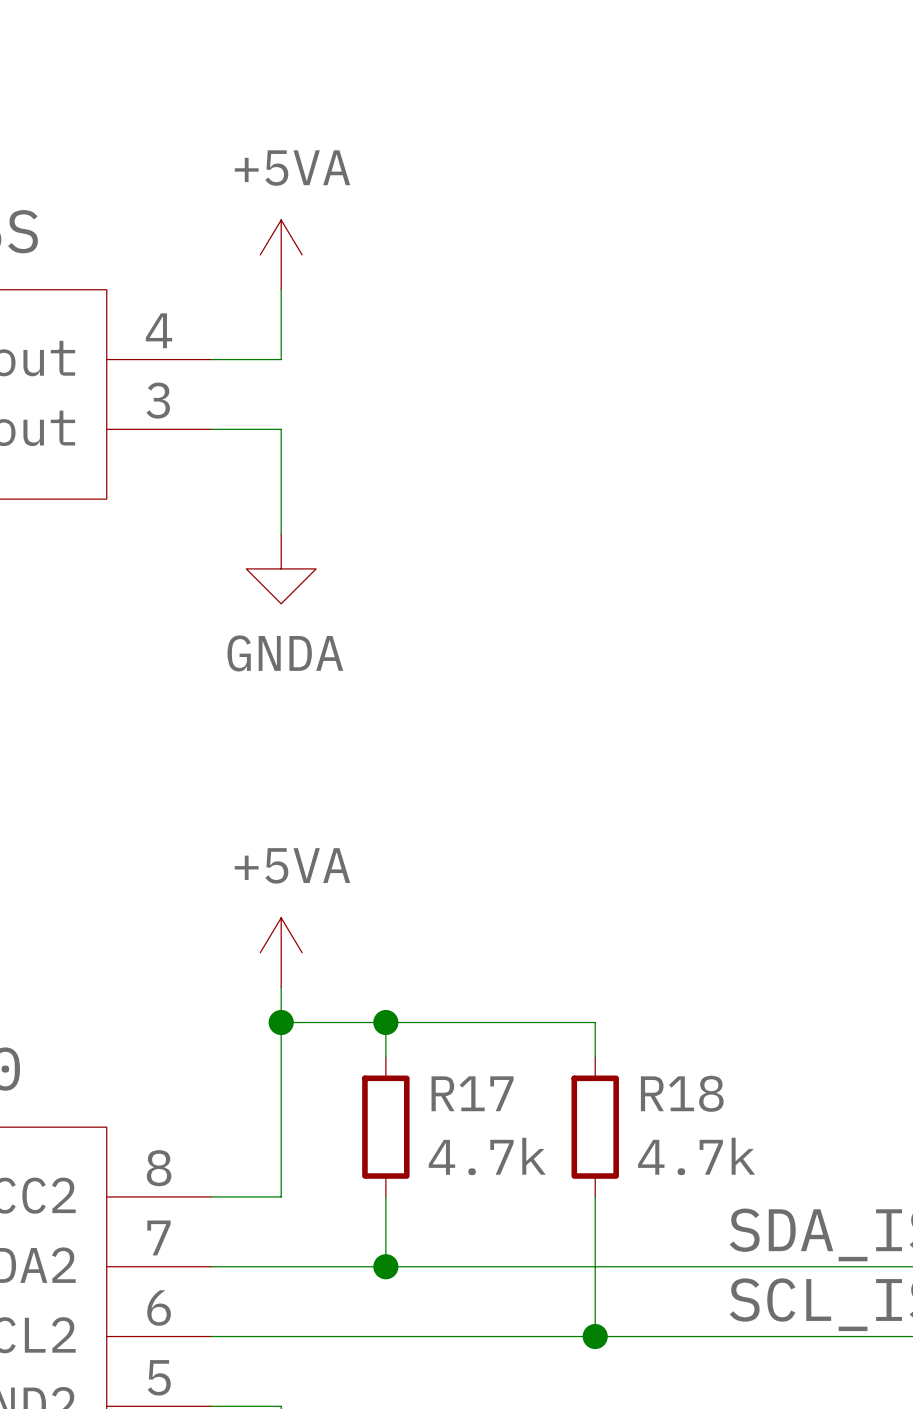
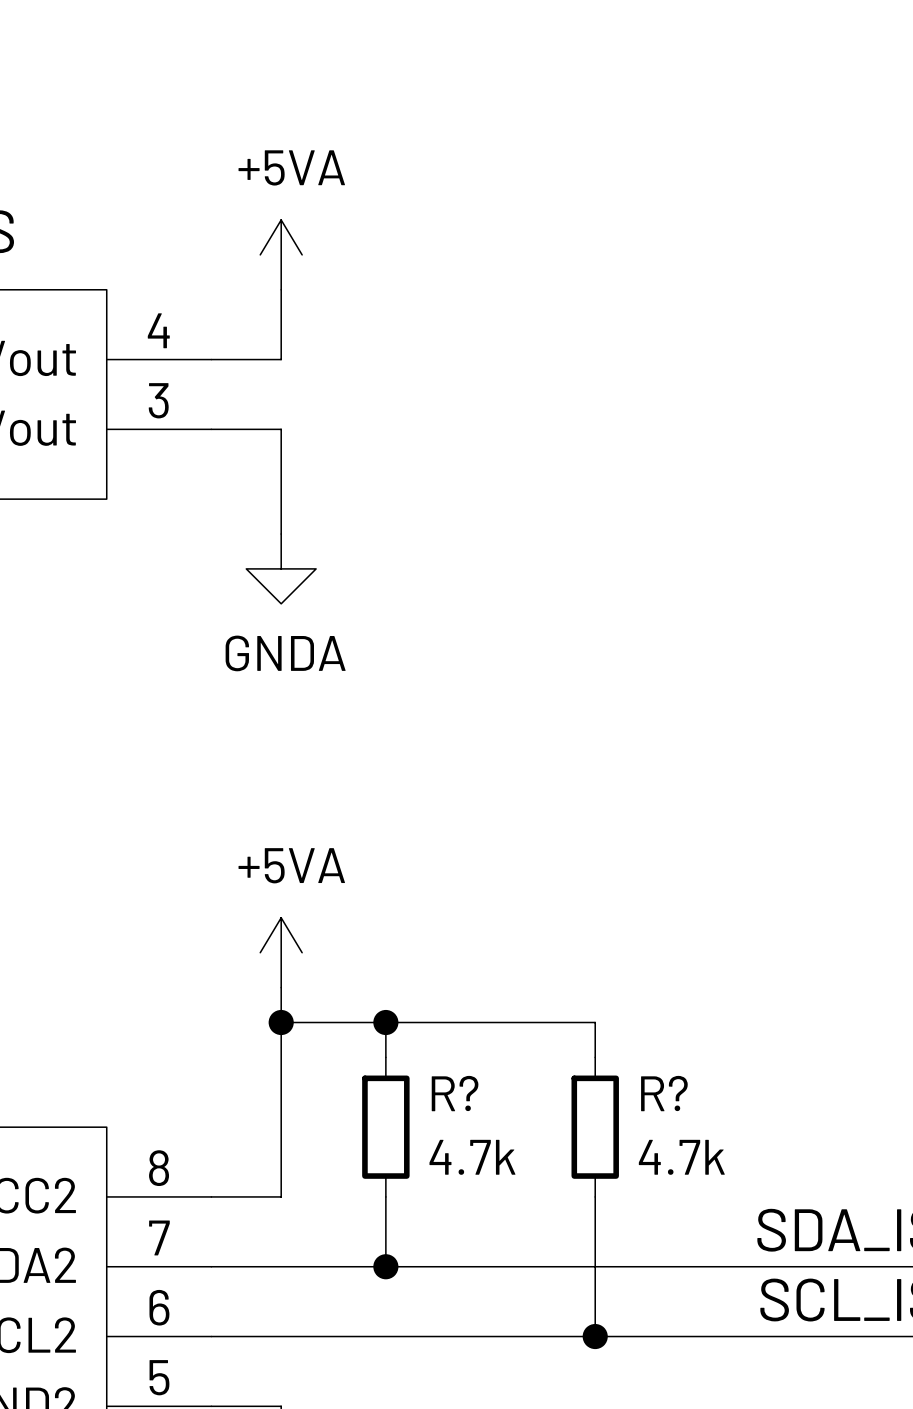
R17 name: R17 (472, 1093) -> R? (455, 1093)
R18 name: R18 (682, 1093) -> R? (664, 1093)

